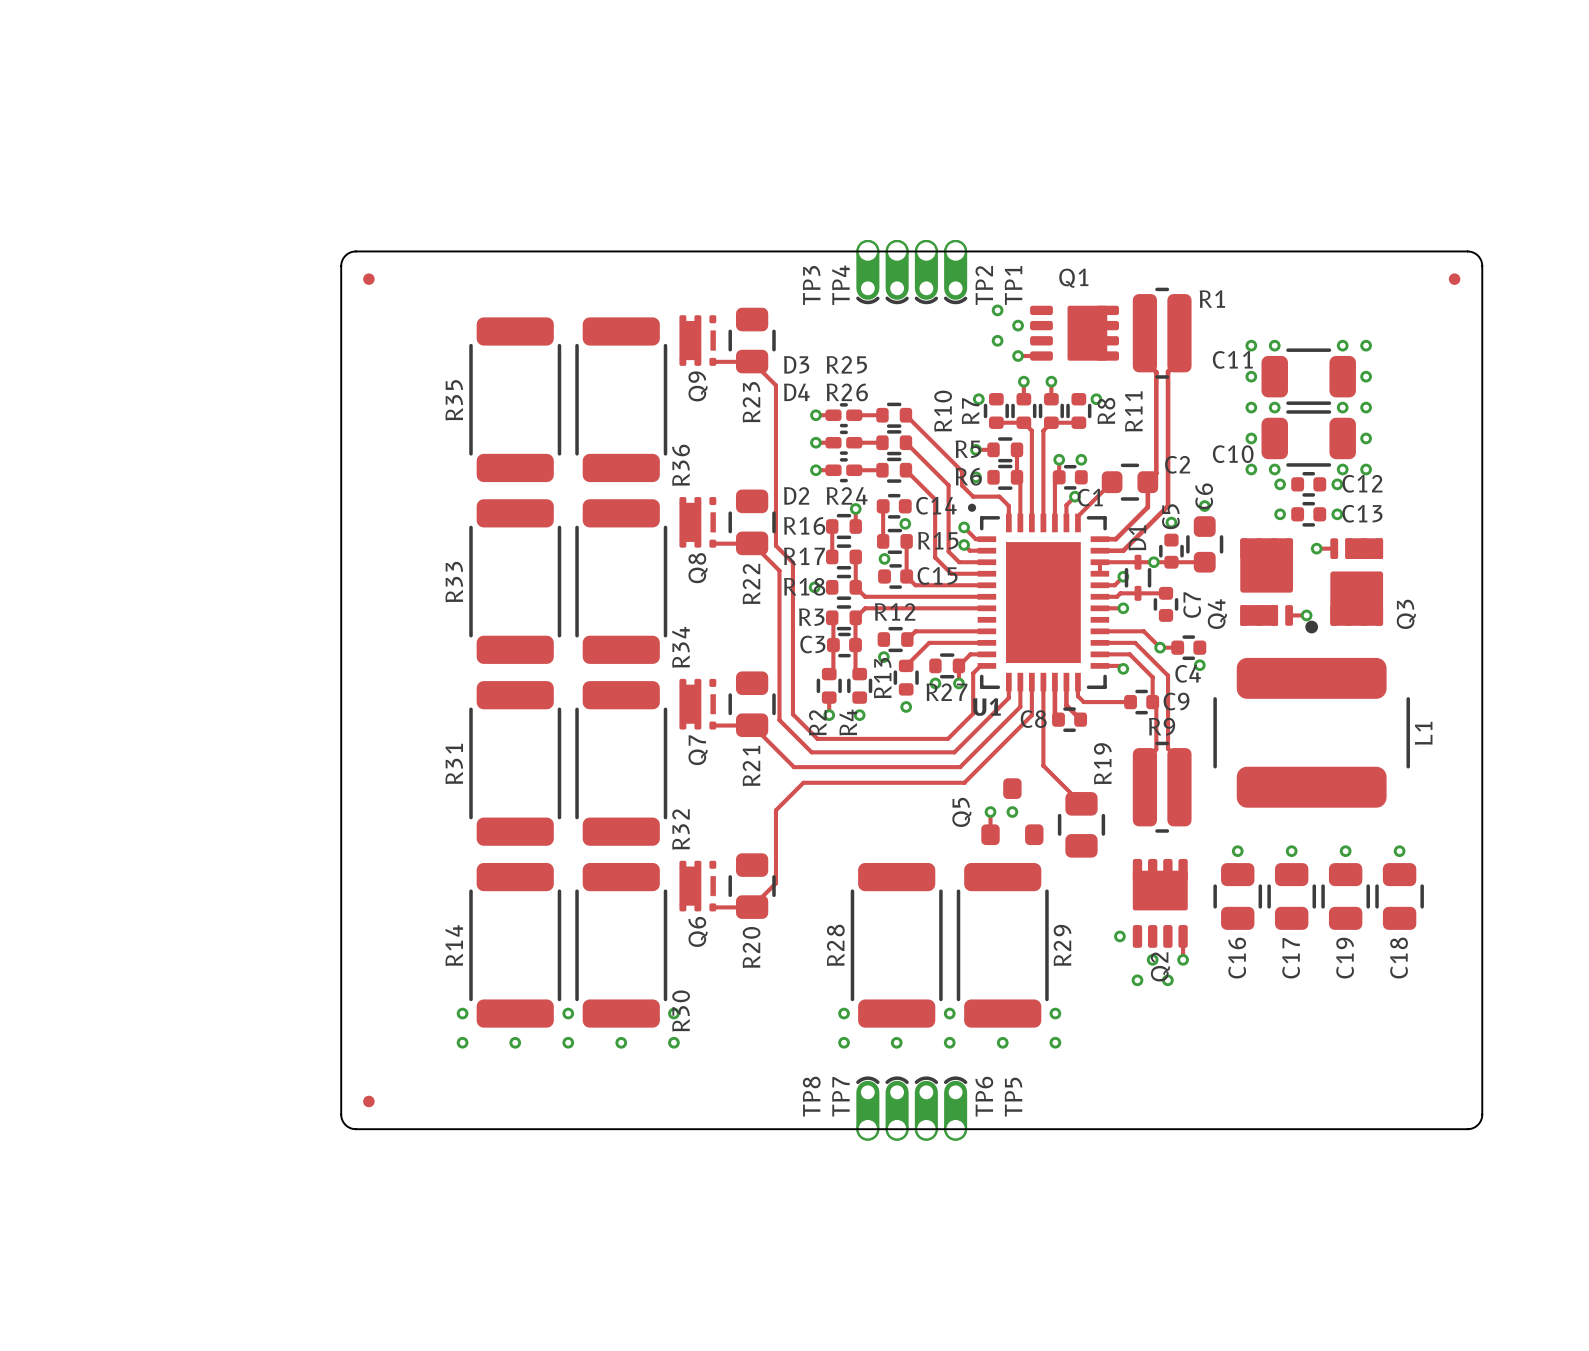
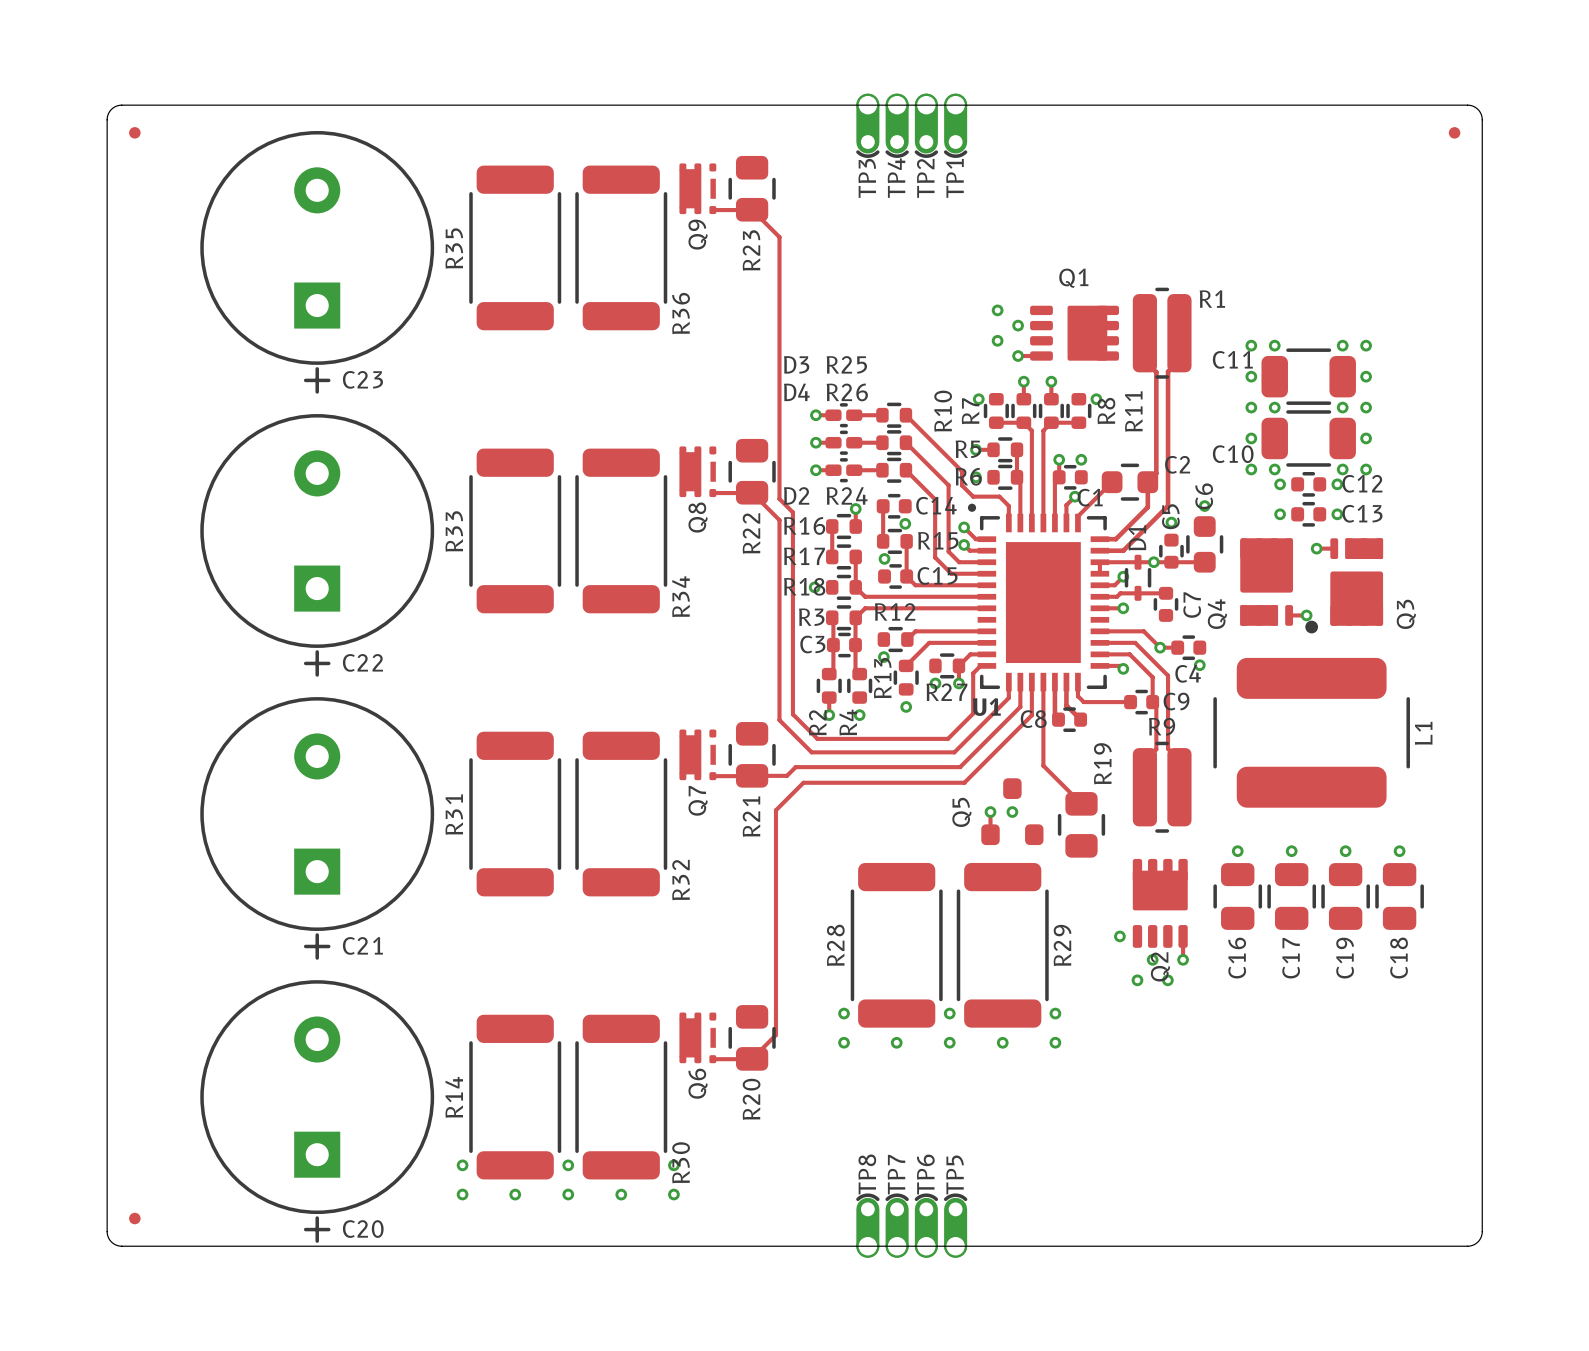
C23: none -> (317, 262)
board edge: (1482, 266) (1477, 255) (1467, 251) (355, 251) (345, 255) (341, 266) (341, 1114) (346, 1126) (355, 1129) (1467, 1129) (1477, 1124) (1482, 1114) -> (1482, 266) (1482, 118) (1477, 109) (1469, 105) (121, 105) (111, 109) (107, 118) (107, 1231) (112, 1243) (121, 1246) (1469, 1246) (1477, 1241) (1482, 1233) (1482, 1114)
TP3 position: (867, 272) -> (867, 125)
TP4 position: (897, 272) -> (897, 125)
TP2 position: (926, 272) -> (926, 125)
TP1 position: (955, 272) -> (955, 125)
part position: (368, 279) -> (134, 132)
part position: (1454, 279) -> (1454, 132)
TP3 name position: TP3 (811, 285) -> TP3 (867, 178)
TP4 name position: TP4 (840, 285) -> TP4 (896, 178)
TP2 name position: TP2 (984, 285) -> TP2 (925, 178)
TP1 name position: TP1 (1013, 285) -> TP1 (954, 178)
Q9 position: (697, 340) -> (697, 188)
R23 position: (752, 340) -> (752, 188)
track: (712, 361) (751, 361) -> (712, 210) (751, 210)
track: (752, 361) (775, 385) (775, 545) (792, 562) -> (752, 209) (779, 237) (779, 498) (792, 512) (792, 562)
R35 position: (515, 399) -> (515, 247)
R36 position: (621, 399) -> (621, 247)
Q8 position: (697, 522) -> (697, 471)
R22 position: (752, 522) -> (752, 471)
track: (712, 543) (751, 543) -> (712, 493) (751, 493)
track: (752, 543) (779, 570) -> (752, 492) (779, 520) (779, 570)
C22: none -> (317, 545)
R33 position: (515, 581) -> (515, 530)
R34 position: (621, 581) -> (621, 530)
Q7 position: (697, 704) -> (697, 754)
R21 position: (752, 704) -> (752, 754)
track: (712, 725) (751, 725) -> (712, 776) (751, 776)
track: (752, 725) (795, 767) -> (752, 775) (787, 775) (795, 767)
R31 position: (515, 763) -> (515, 814)
R32 position: (621, 763) -> (621, 814)
C21: none -> (317, 828)
track: (775, 883) (751, 907) (712, 907) -> (775, 883) (775, 1035) (752, 1058)
Q6 position: (697, 886) -> (697, 1037)
R20 position: (752, 886) -> (752, 1037)
R14 position: (515, 945) -> (515, 1097)
R30 position: (621, 945) -> (621, 1097)
via: (462, 1013) -> none
via: (568, 1013) -> none
via: (673, 1013) -> none
via: (462, 1042) -> none
via: (515, 1042) -> none
via: (568, 1042) -> none
via: (621, 1042) -> none
via: (673, 1042) -> none
track: none -> (712, 1059) (751, 1059)
TP8 name position: TP8 (811, 1096) -> TP8 (867, 1174)
TP7 name position: TP7 (840, 1096) -> TP7 (896, 1174)
TP6 name position: TP6 (984, 1096) -> TP6 (925, 1174)
TP5 name position: TP5 (1013, 1097) -> TP5 (955, 1174)
part position: (368, 1101) -> (134, 1218)
TP8 position: (867, 1108) -> (867, 1225)
TP7 position: (897, 1108) -> (897, 1225)
TP6 position: (926, 1108) -> (926, 1225)
TP5 position: (955, 1108) -> (955, 1225)
C20: none -> (317, 1111)
via: none -> (462, 1165)
via: none -> (568, 1165)
via: none -> (673, 1165)
via: none -> (462, 1194)
via: none -> (515, 1194)
via: none -> (568, 1194)
via: none -> (621, 1194)
via: none -> (673, 1194)

